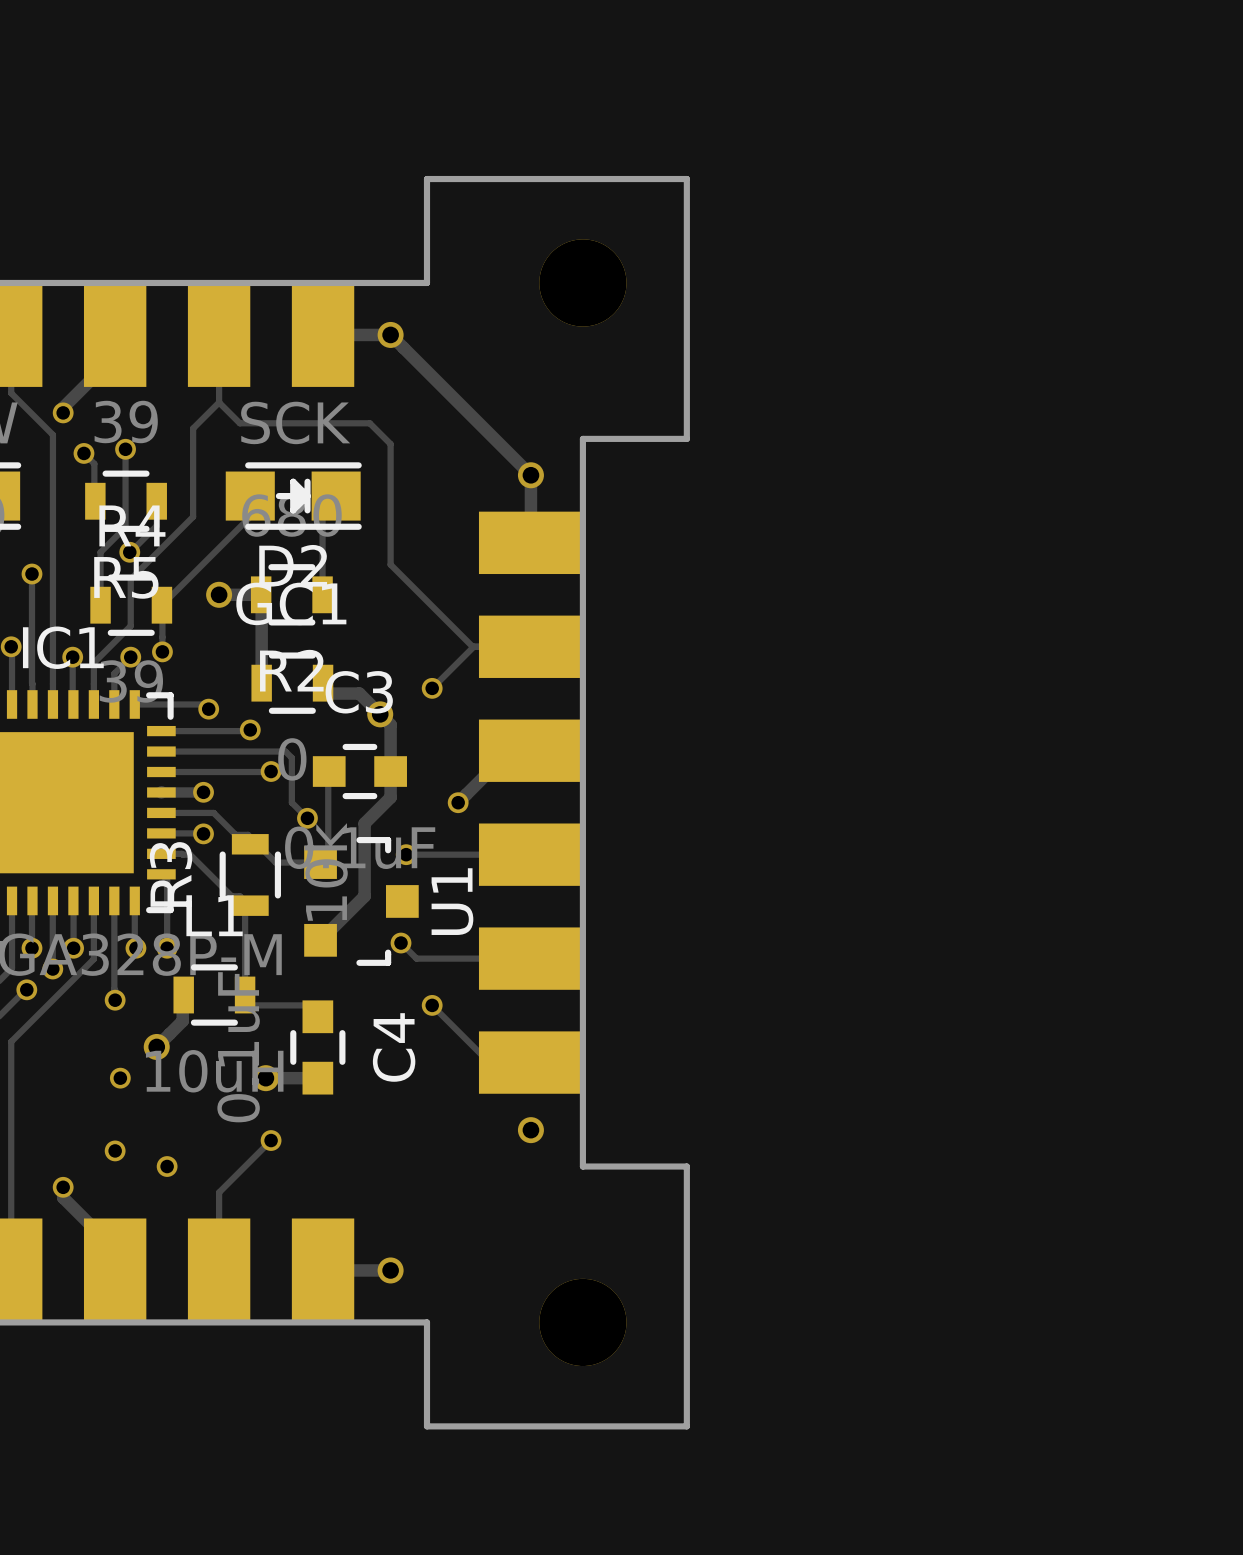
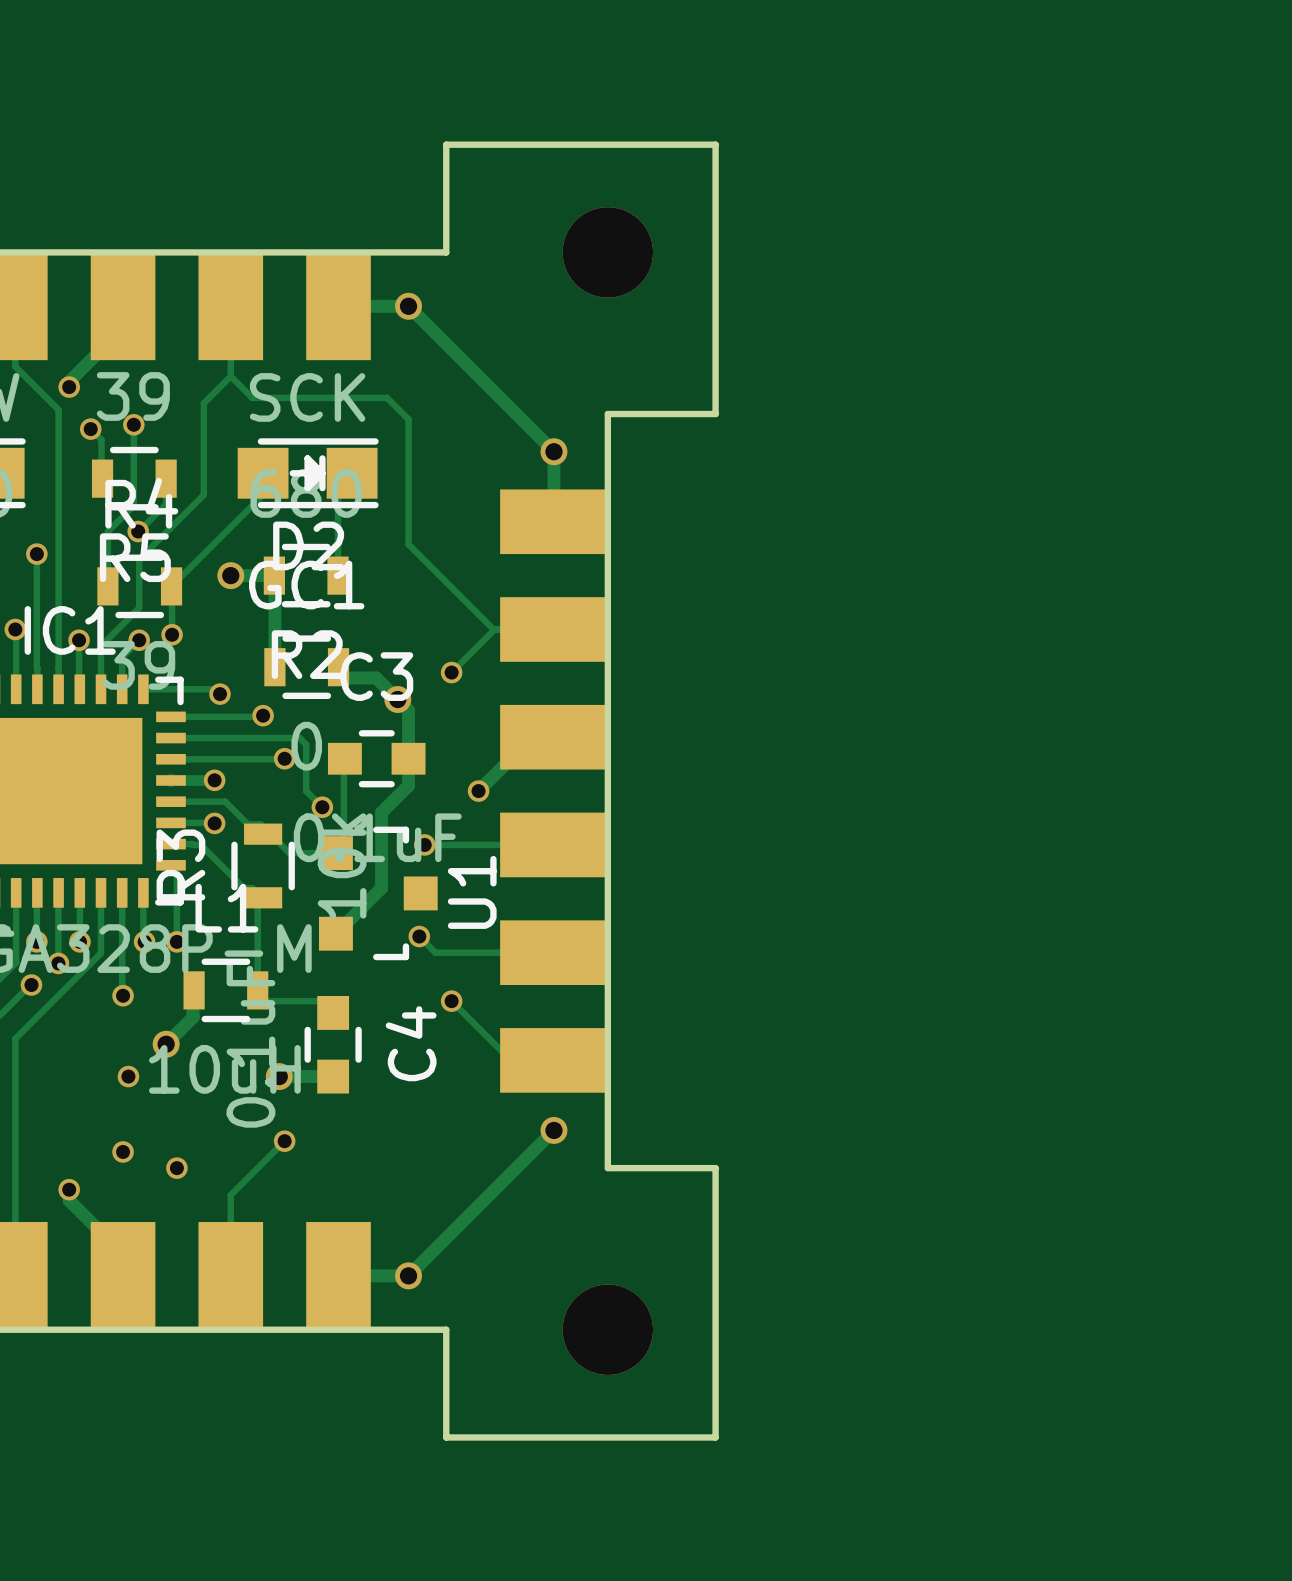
track: none -> (553, 1130) (408, 1275)

